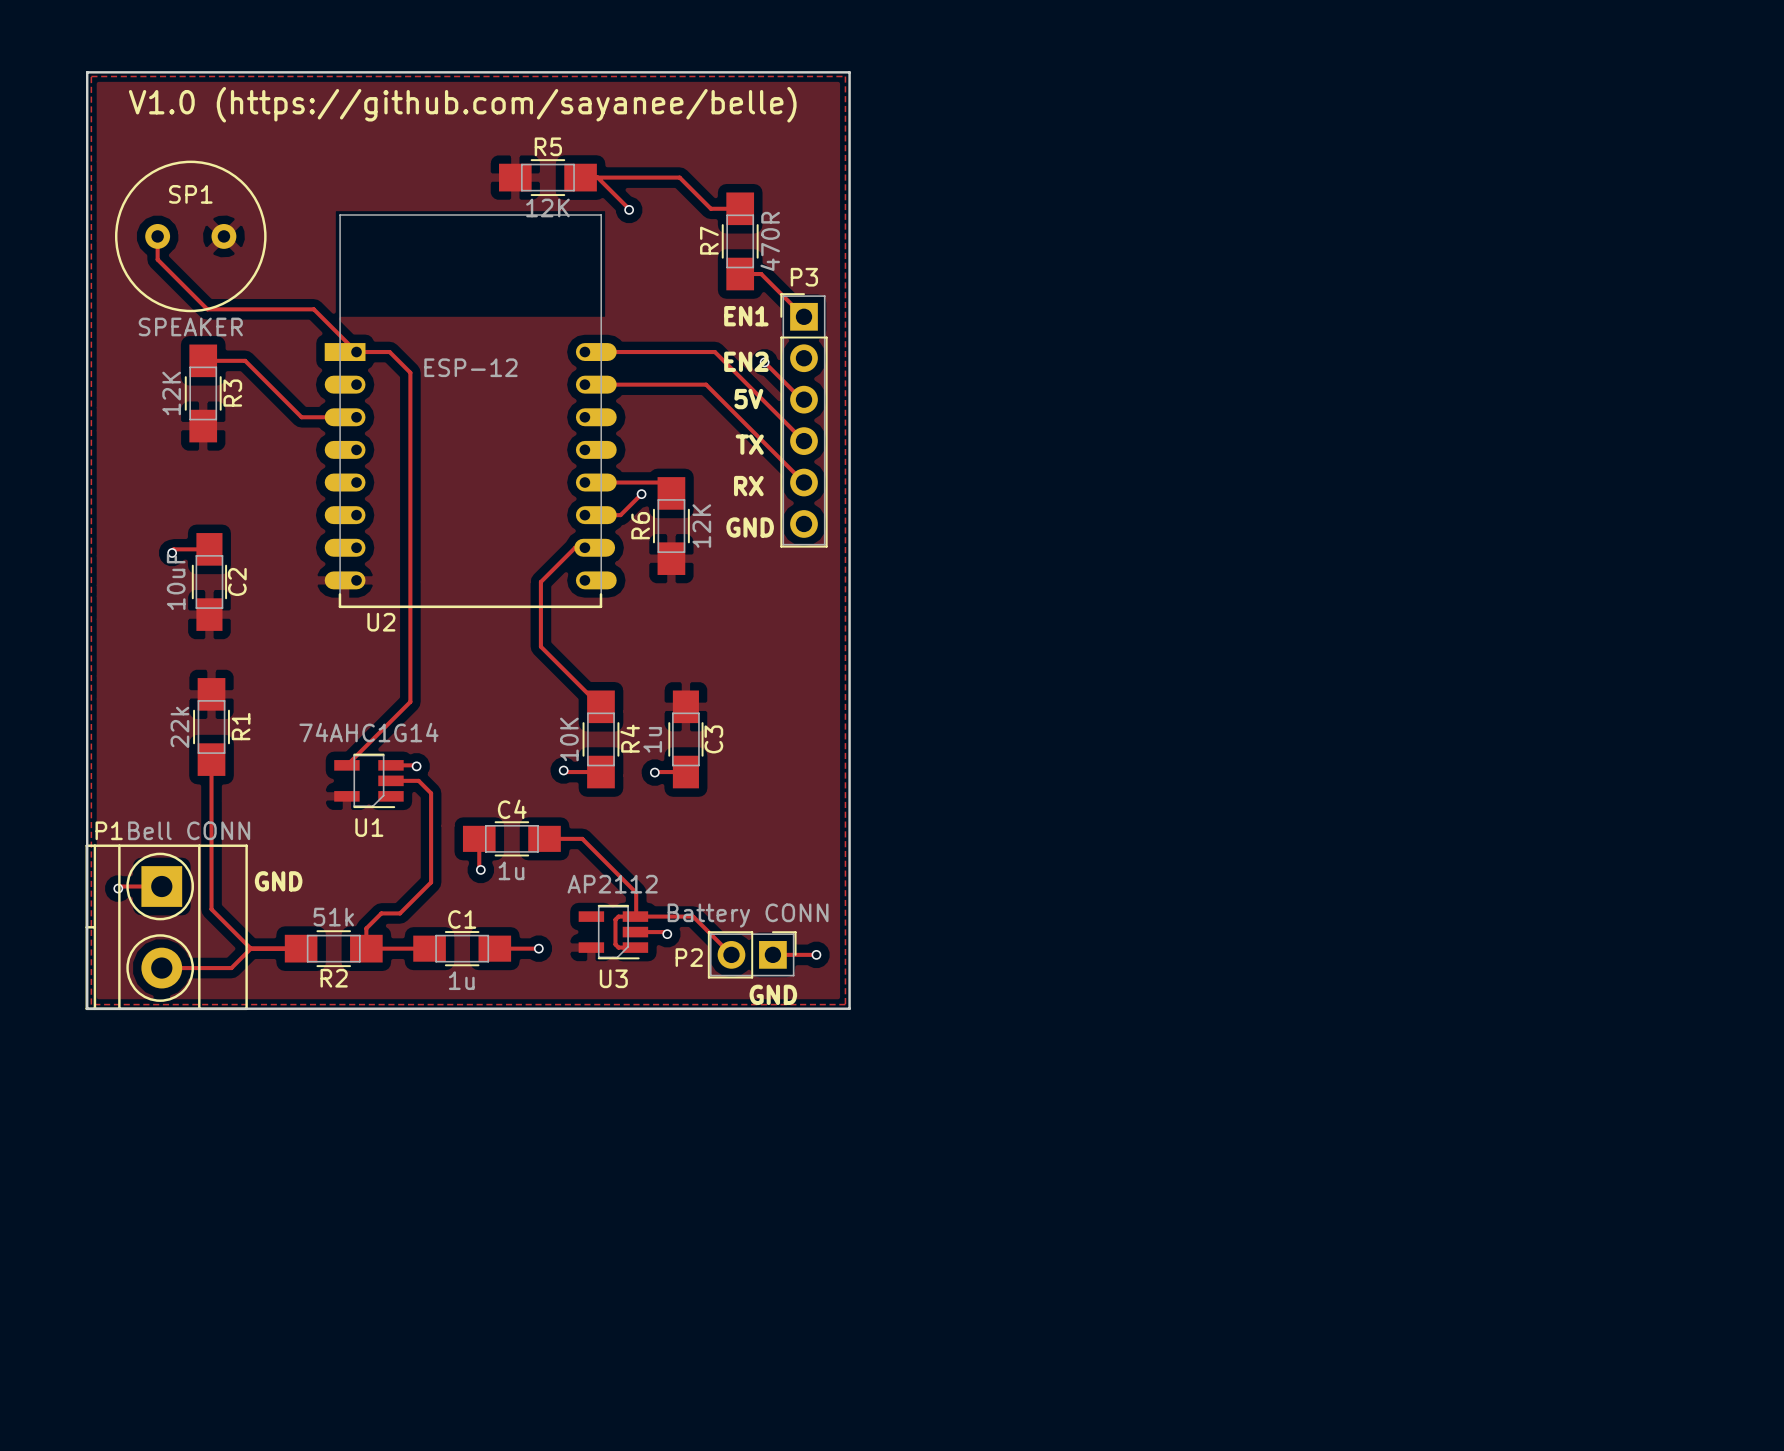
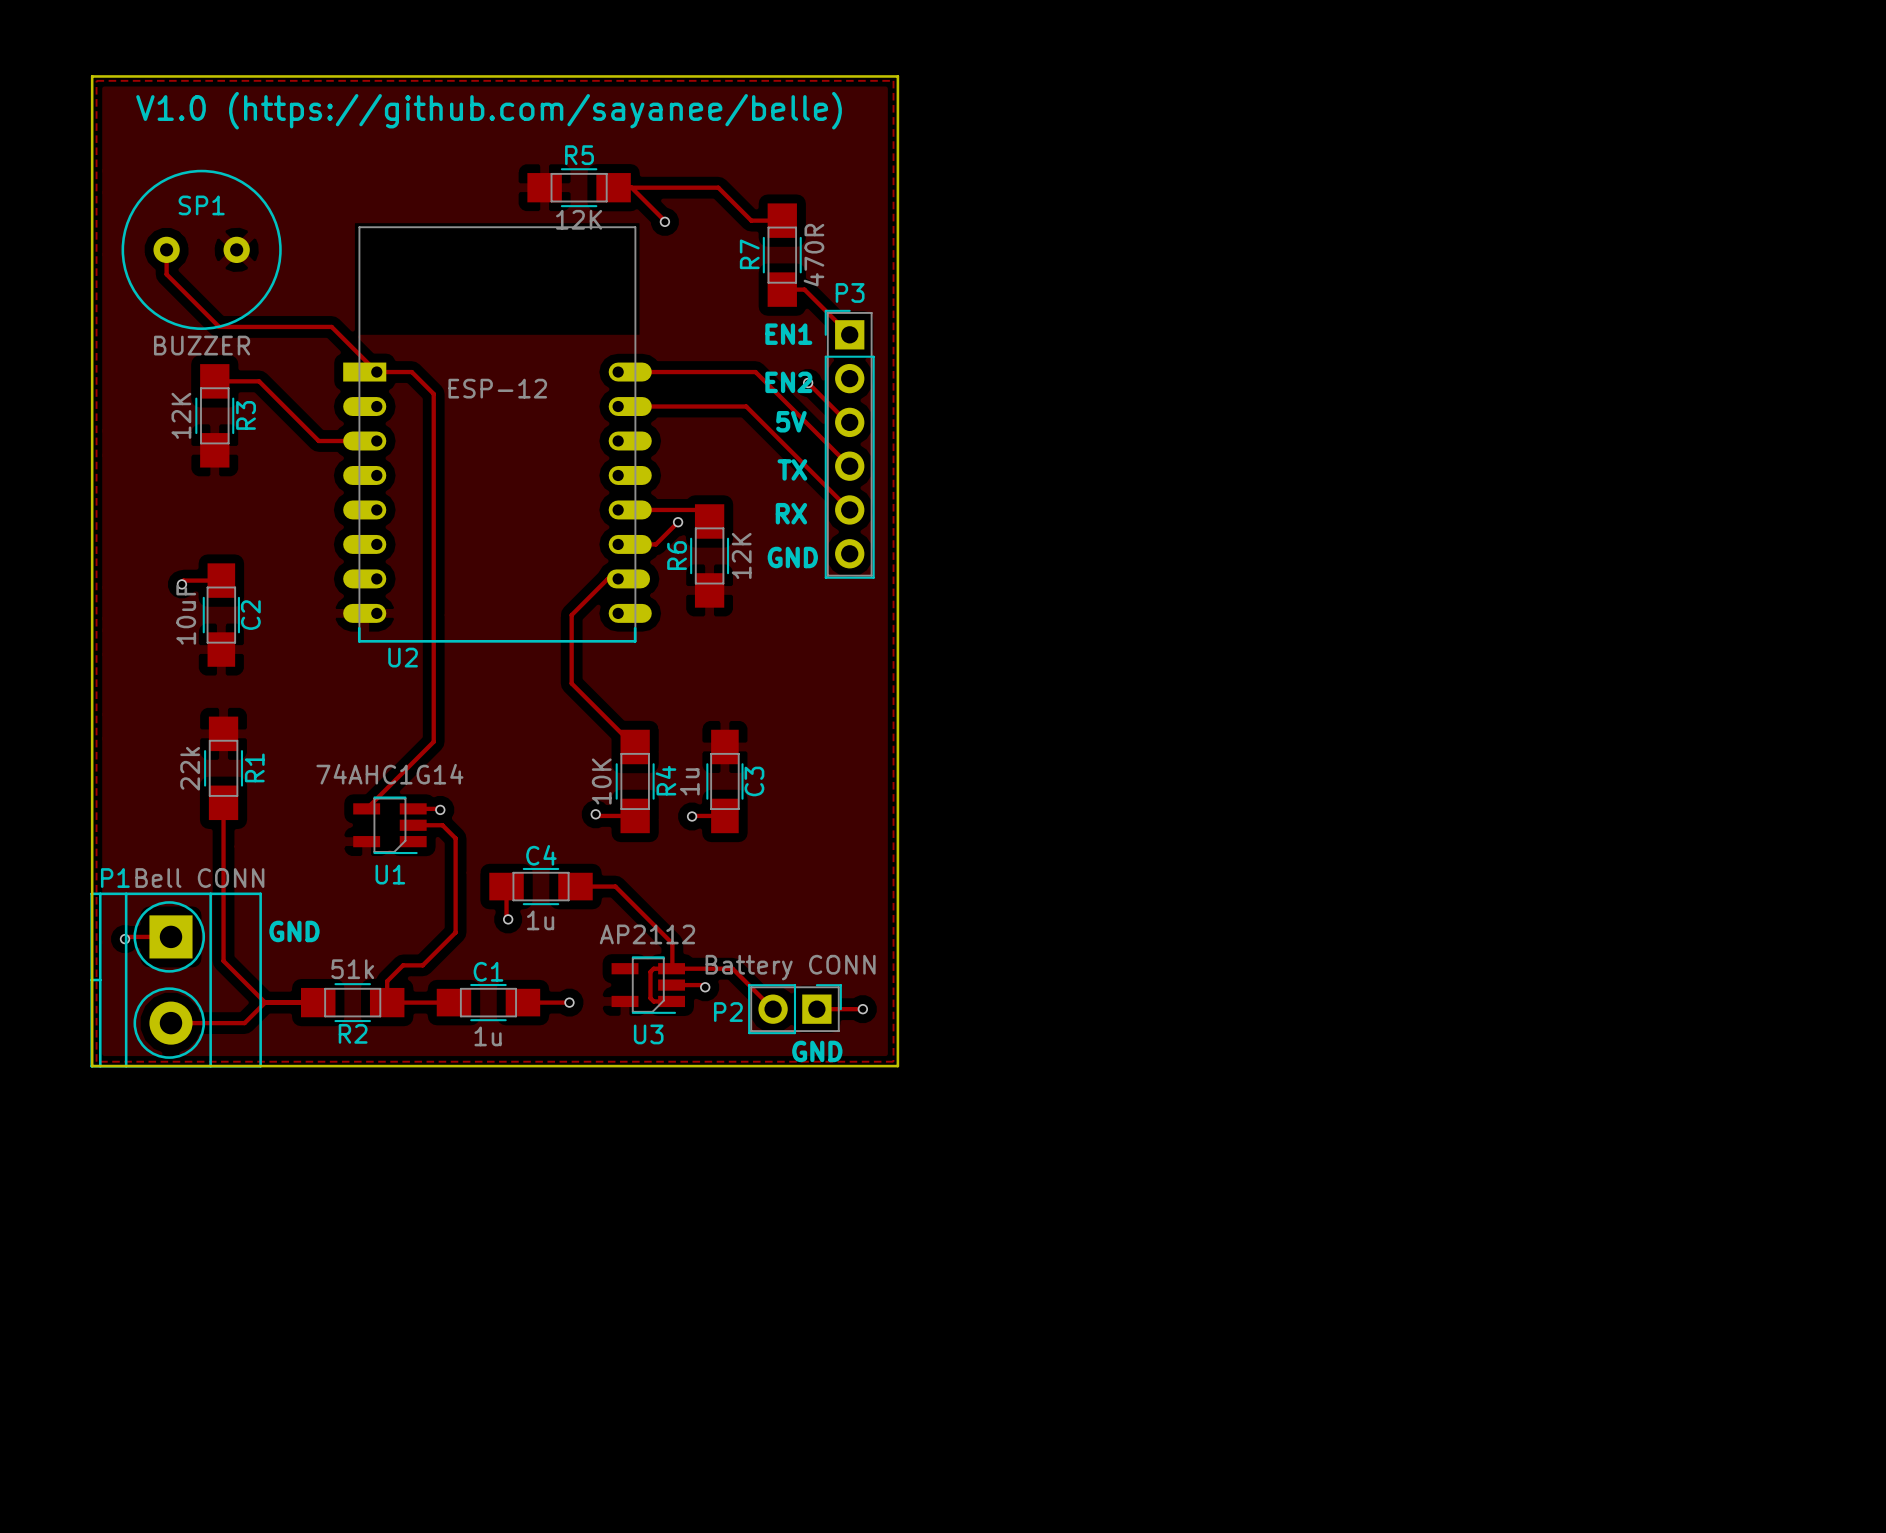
SP1 value: SPEAKER (190, 326) -> BUZZER (202, 345)

